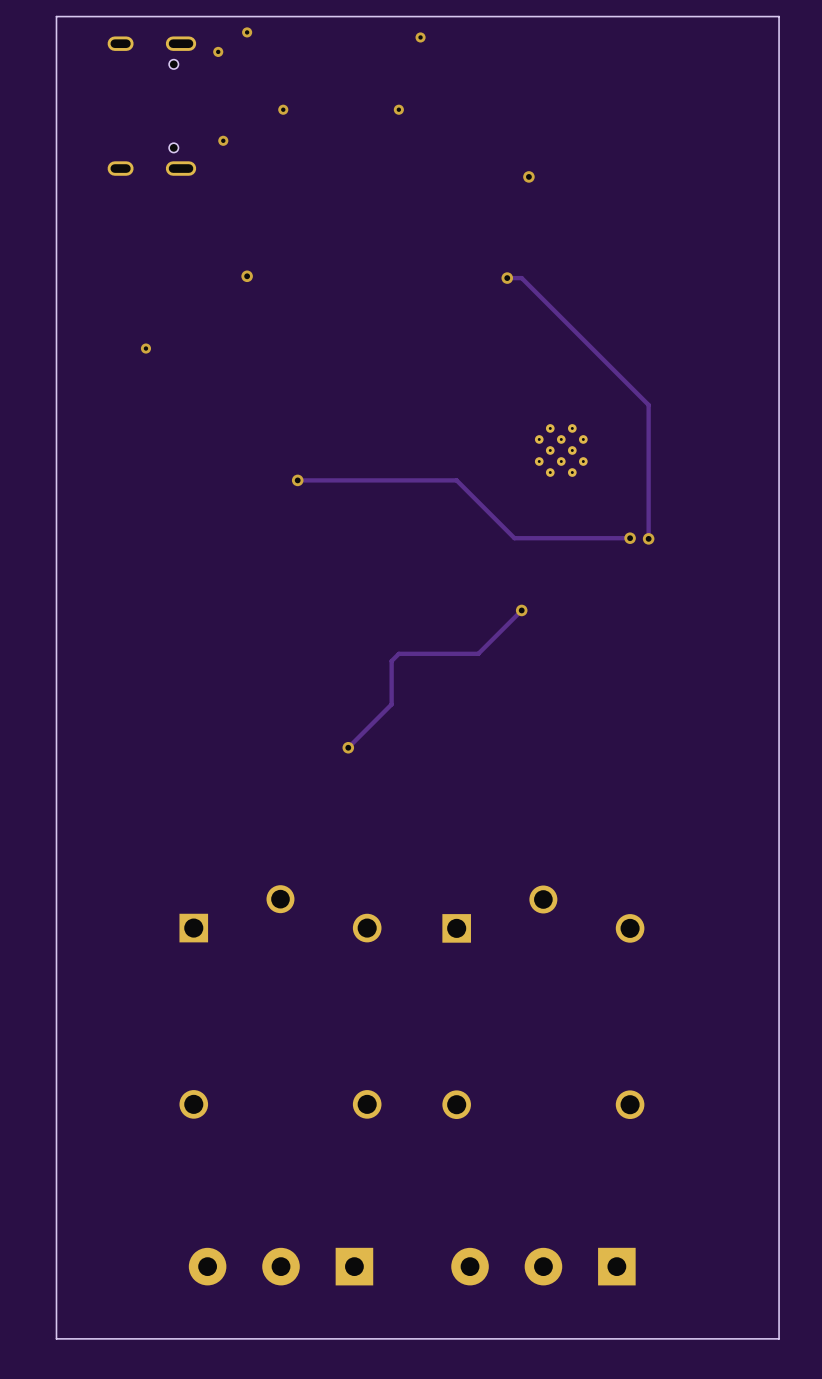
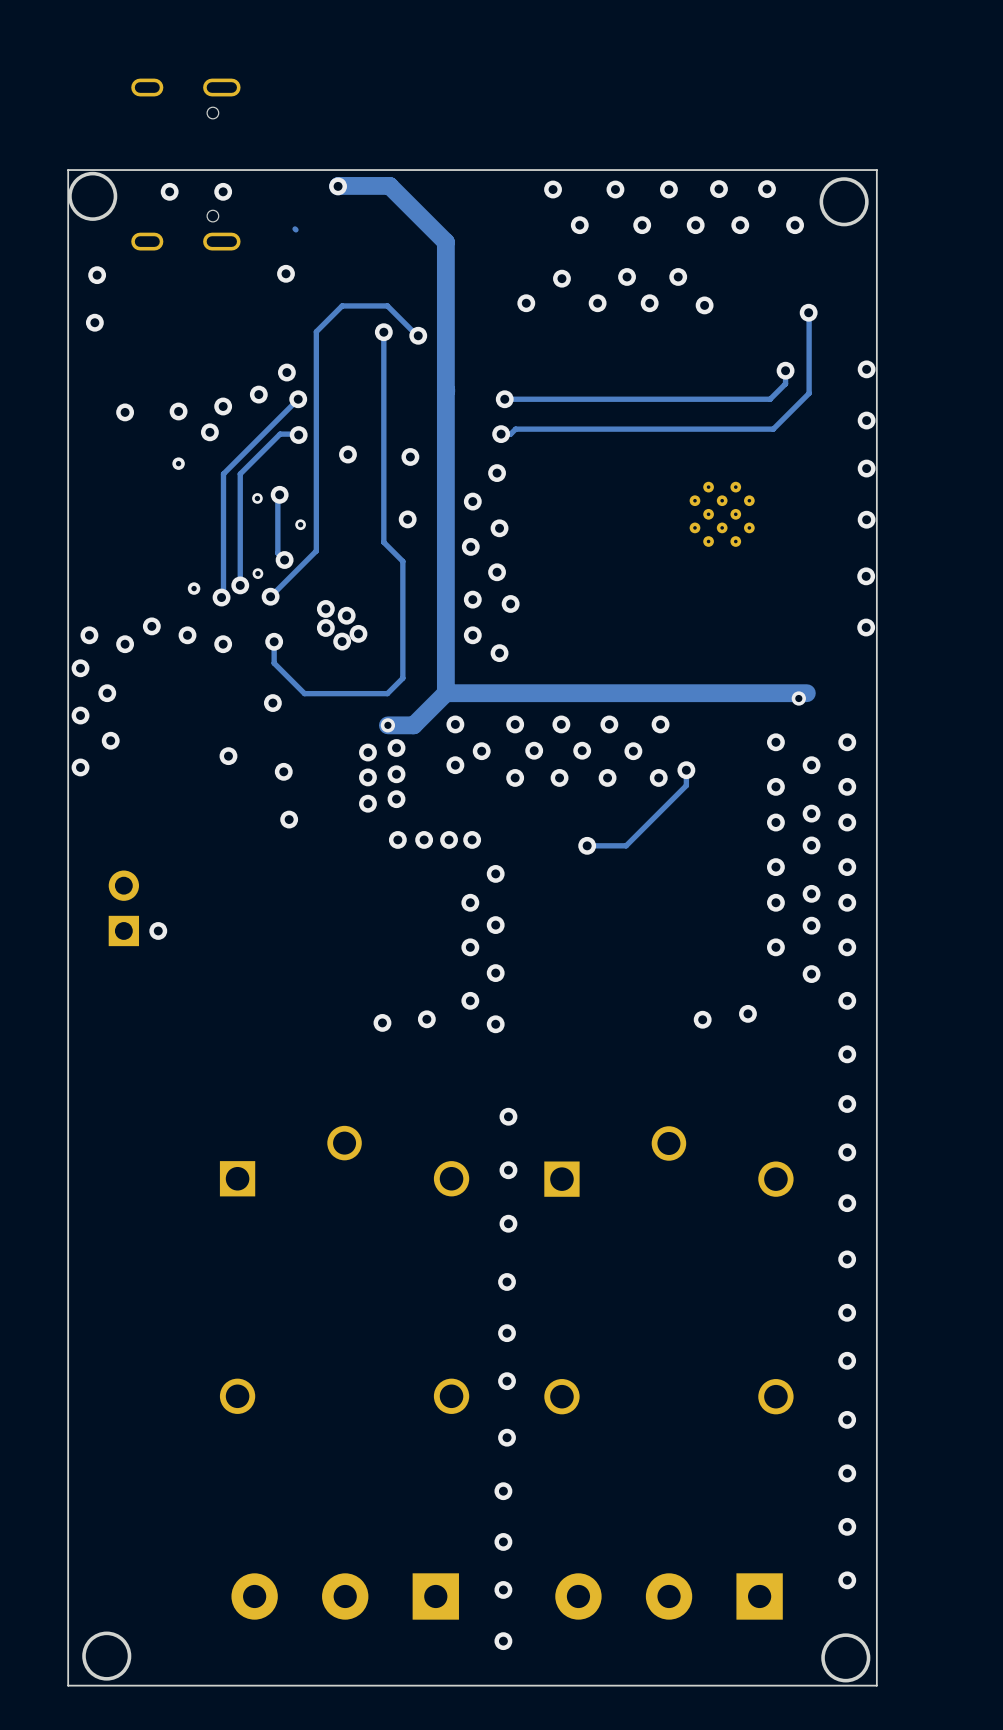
via: (247, 32) -> none
via: (420, 37) -> none
via: (218, 51) -> none
via: (283, 109) -> none
via: (398, 109) -> none
board edge: (56, 110) (56, 16) (779, 16) (779, 1338) (711, 1338) -> (68, 170) (876, 170) (876, 1685)
round board edge: none -> [68, 171, 118, 221]
round board edge: none -> [819, 177, 869, 227]
track: none -> (338, 186) (389, 185) (445, 242) (445, 693)
via: none -> (338, 186)
via: none -> (553, 189)
via: none -> (615, 189)
via: none -> (668, 189)
via: none -> (718, 189)
via: none -> (767, 189)
via: none -> (169, 191)
via: none -> (223, 191)
via: (223, 140) -> none
via: none -> (579, 225)
via: none -> (642, 225)
via: none -> (695, 225)
via: none -> (740, 225)
via: none -> (795, 225)
track: none -> (295, 228) (295, 229)
via: (528, 176) -> none
via: none -> (286, 273)
via: none -> (97, 275)
via: none -> (627, 276)
via: none -> (678, 276)
via: none -> (561, 278)
via: none -> (526, 303)
via: none -> (597, 303)
via: none -> (649, 303)
via: none -> (704, 305)
track: none -> (808, 312) (809, 393) (773, 429) (515, 429) (510, 434) (501, 434)
via: none -> (808, 312)
via: none -> (94, 322)
track: none -> (383, 332) (383, 542) (402, 561) (402, 678) (387, 693) (304, 693) (274, 663) (274, 641)
via: none -> (383, 332)
track: none -> (418, 335) (387, 305) (342, 305) (316, 331) (316, 550) (270, 596)
via: none -> (418, 335)
via: none -> (866, 369)
track: none -> (785, 370) (785, 383) (770, 399) (504, 399)
via: none -> (785, 370)
via: none -> (286, 372)
via: (247, 276) -> none
track: (507, 278) (521, 278) (648, 405) (648, 538) -> none
via: (507, 278) -> none
via: none -> (258, 394)
track: none -> (298, 399) (223, 473) (223, 595) (221, 597)
via: none -> (298, 399)
via: none -> (504, 399)
via: none -> (223, 406)
via: none -> (125, 412)
via: none -> (178, 411)
via: none -> (866, 420)
via: none -> (209, 432)
via: none -> (501, 434)
track: none -> (298, 435) (280, 434) (240, 473) (240, 585)
via: none -> (298, 435)
via: none -> (347, 454)
via: none -> (410, 456)
via: none -> (866, 468)
via: none -> (497, 473)
track: none -> (279, 494) (277, 496) (277, 553) (284, 560)
via: none -> (279, 494)
via: none -> (257, 498)
via: none -> (472, 501)
via: none -> (407, 519)
via: none -> (866, 519)
via: none -> (300, 524)
via: none -> (499, 528)
via: none -> (470, 546)
via: none -> (284, 560)
via: none -> (497, 572)
via: none -> (257, 573)
via: none -> (866, 576)
via: none -> (240, 585)
via: none -> (194, 588)
part position: (561, 450) -> (722, 514)
via: none -> (270, 596)
via: none -> (221, 597)
via: none -> (472, 599)
via: none -> (510, 603)
via: none -> (325, 608)
via: none -> (346, 615)
via: none -> (151, 626)
track: (297, 480) (456, 480) (514, 538) (630, 538) -> none
via position: (297, 480) -> (387, 725)
via: none -> (325, 627)
via: none -> (866, 627)
via: none -> (358, 633)
via: none -> (89, 635)
via: none -> (187, 635)
via: none -> (472, 635)
via: none -> (274, 641)
via: none -> (342, 641)
via: none -> (125, 644)
via: none -> (223, 644)
via: none -> (499, 653)
via: none -> (80, 668)
via: none -> (107, 693)
track: none -> (445, 693) (413, 725) (387, 725)
track: none -> (806, 693) (445, 693)
via: (630, 538) -> none
via: none -> (272, 703)
via: none -> (80, 715)
via: none -> (455, 724)
via: none -> (515, 724)
via: none -> (561, 724)
via: none -> (609, 724)
via: none -> (660, 724)
via: none -> (110, 740)
via: none -> (775, 742)
via: none -> (847, 742)
via: none -> (396, 747)
via: none -> (481, 751)
via: none -> (534, 750)
via: none -> (582, 750)
via: none -> (633, 751)
via: none -> (367, 752)
via: none -> (228, 756)
via: none -> (455, 765)
via: none -> (811, 765)
via: none -> (80, 767)
track: none -> (686, 770) (686, 785) (626, 845) (587, 845)
via: none -> (686, 770)
via: none -> (283, 771)
via: none -> (396, 774)
via: none -> (367, 777)
via: none -> (515, 777)
via: none -> (559, 777)
via: none -> (607, 777)
via: none -> (658, 777)
track: (521, 610) (478, 653) (398, 653) (391, 661) (391, 704) (348, 747) -> none
via: (521, 610) -> none
via: none -> (775, 786)
via: none -> (847, 786)
via: none -> (396, 799)
via: none -> (367, 803)
via: none -> (811, 813)
via: none -> (289, 819)
via: none -> (775, 822)
via: none -> (847, 822)
via: none -> (397, 839)
via: none -> (424, 839)
via: none -> (449, 839)
via: none -> (472, 839)
via: none -> (811, 845)
via: none -> (587, 845)
via: none -> (775, 867)
via: none -> (847, 867)
via: none -> (495, 873)
via: none -> (811, 893)
via: none -> (470, 902)
via: none -> (775, 902)
via: none -> (847, 902)
part: none -> (123, 908)
via: none -> (495, 925)
via: none -> (811, 925)
via: none -> (158, 930)
via: none -> (470, 947)
via: none -> (775, 947)
via: none -> (847, 947)
via: (348, 747) -> none
via: none -> (495, 973)
via: none -> (811, 974)
via: none -> (470, 1000)
via: none -> (847, 1000)
via: none -> (747, 1013)
via: none -> (426, 1019)
via: none -> (702, 1019)
via: none -> (382, 1022)
via: none -> (495, 1024)
via: none -> (847, 1054)
via: none -> (847, 1103)
via: none -> (508, 1116)
via: none -> (847, 1152)
via: none -> (508, 1170)
via: none -> (847, 1203)
via: none -> (508, 1223)
via: none -> (847, 1259)
via: none -> (507, 1281)
via: none -> (847, 1312)
via: none -> (507, 1333)
via: none -> (847, 1360)
via: none -> (507, 1381)
via: none -> (847, 1419)
via: none -> (507, 1437)
via: none -> (847, 1473)
via: none -> (503, 1491)
via: none -> (847, 1526)
via: none -> (503, 1541)
via: none -> (847, 1580)
via: none -> (503, 1589)
round board edge: none -> [82, 1631, 132, 1681]
round board edge: none -> [821, 1633, 871, 1683]
via: none -> (503, 1641)

